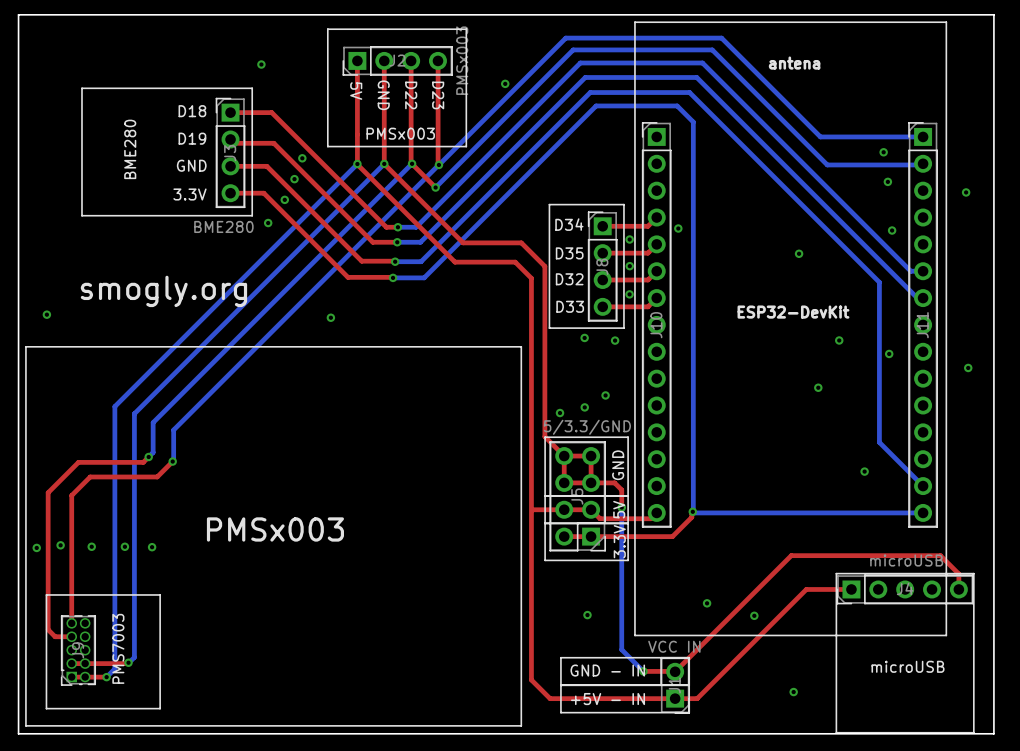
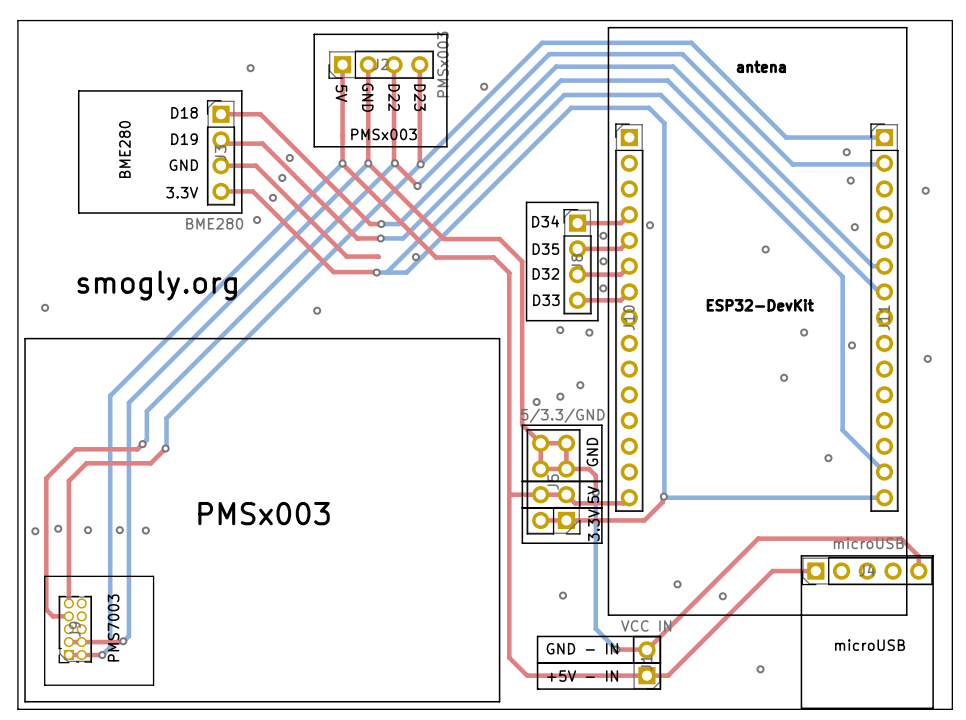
bottom track: (590, 92) (421, 261) (395, 261) -> (565, 95) (386, 272)
via position: (395, 261) -> (415, 257)

